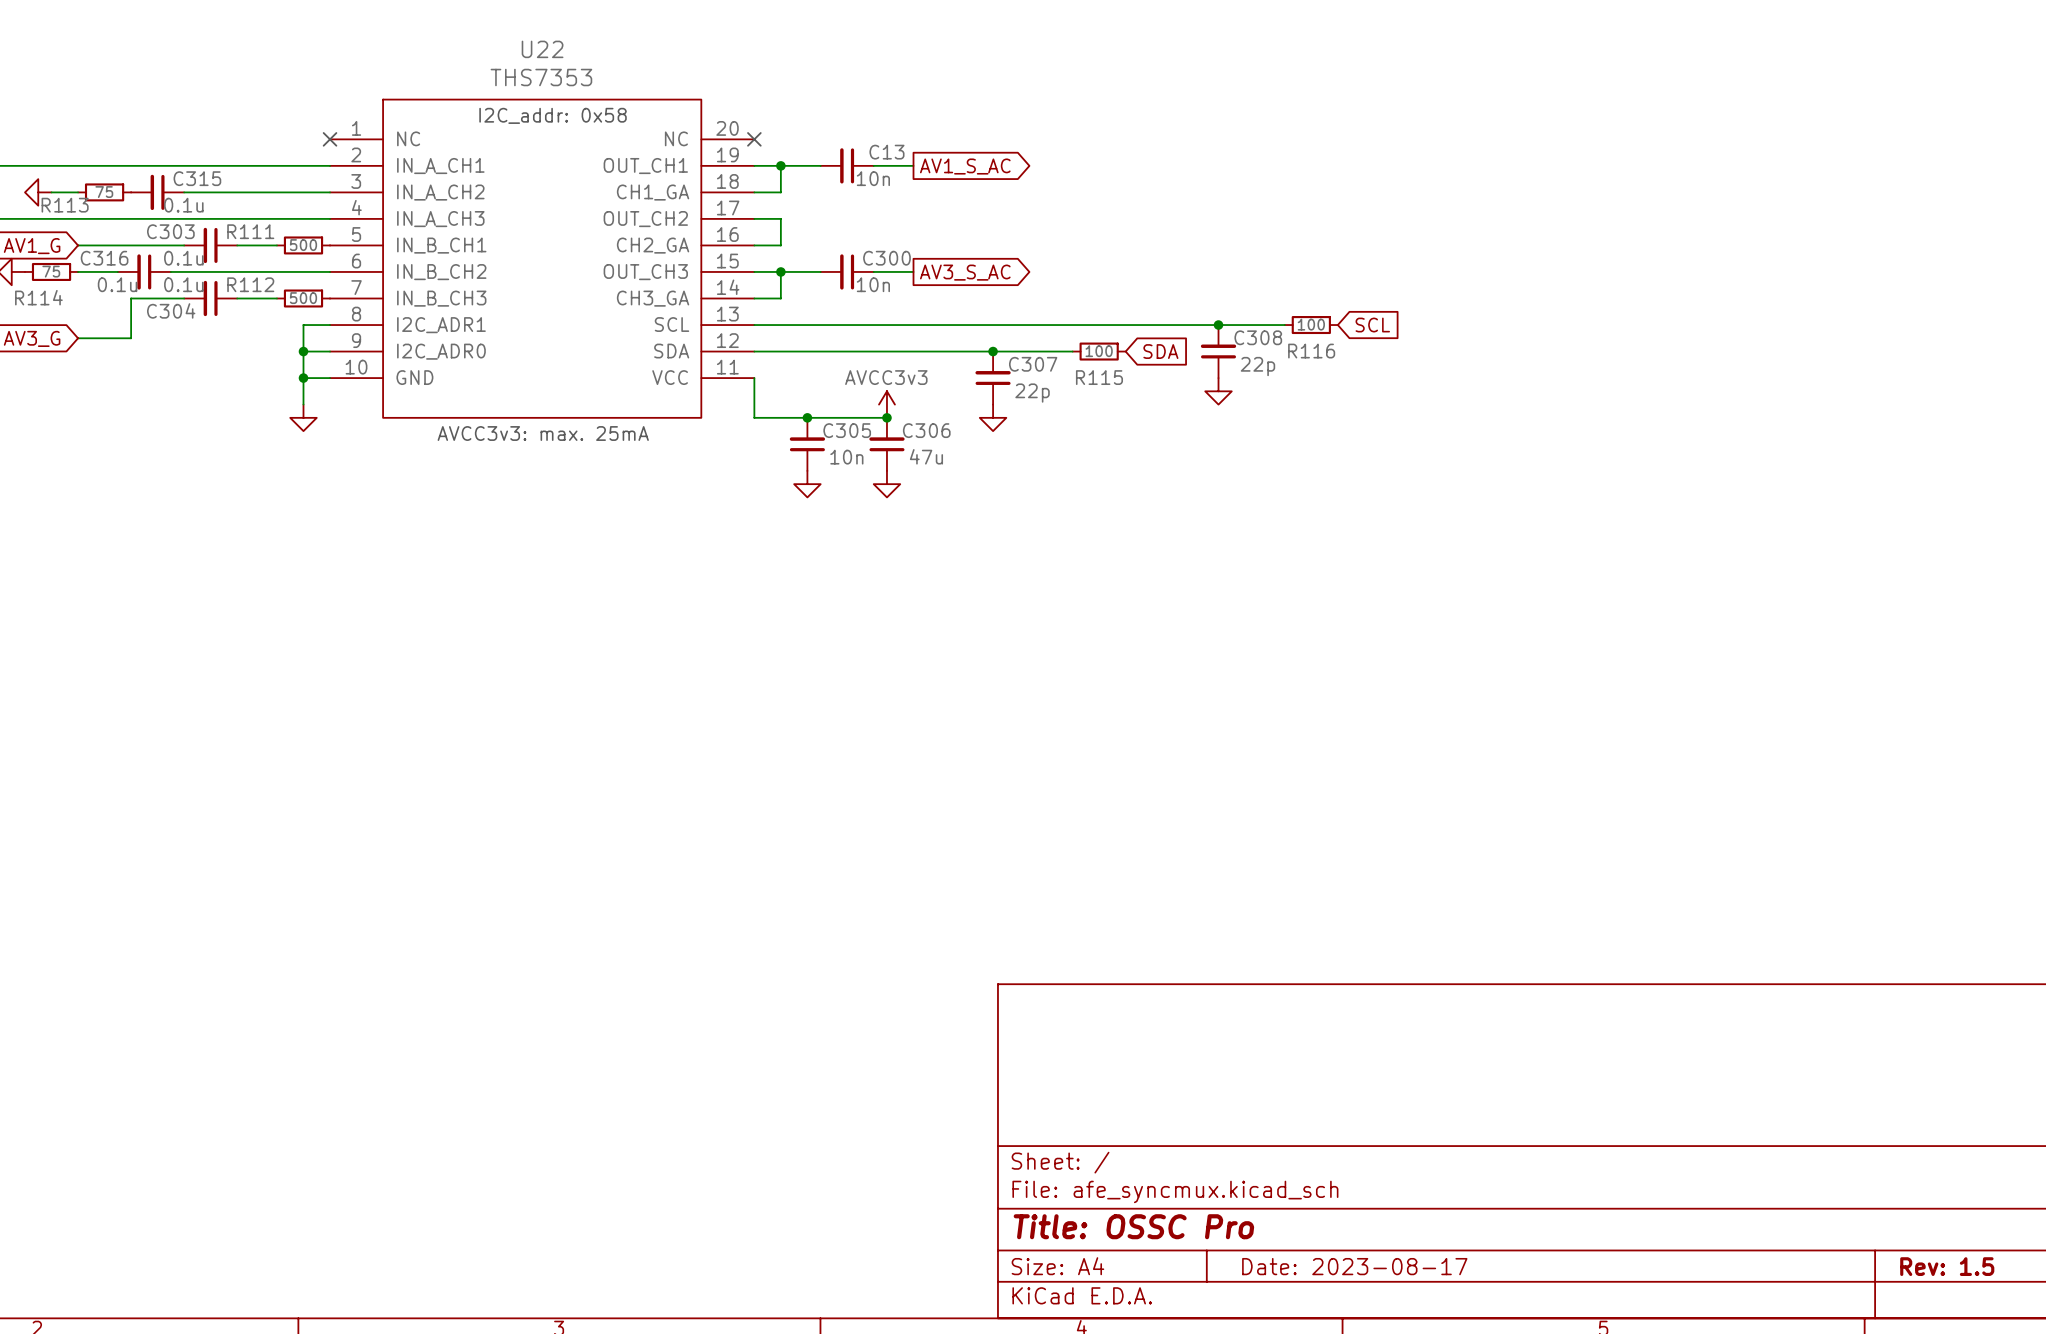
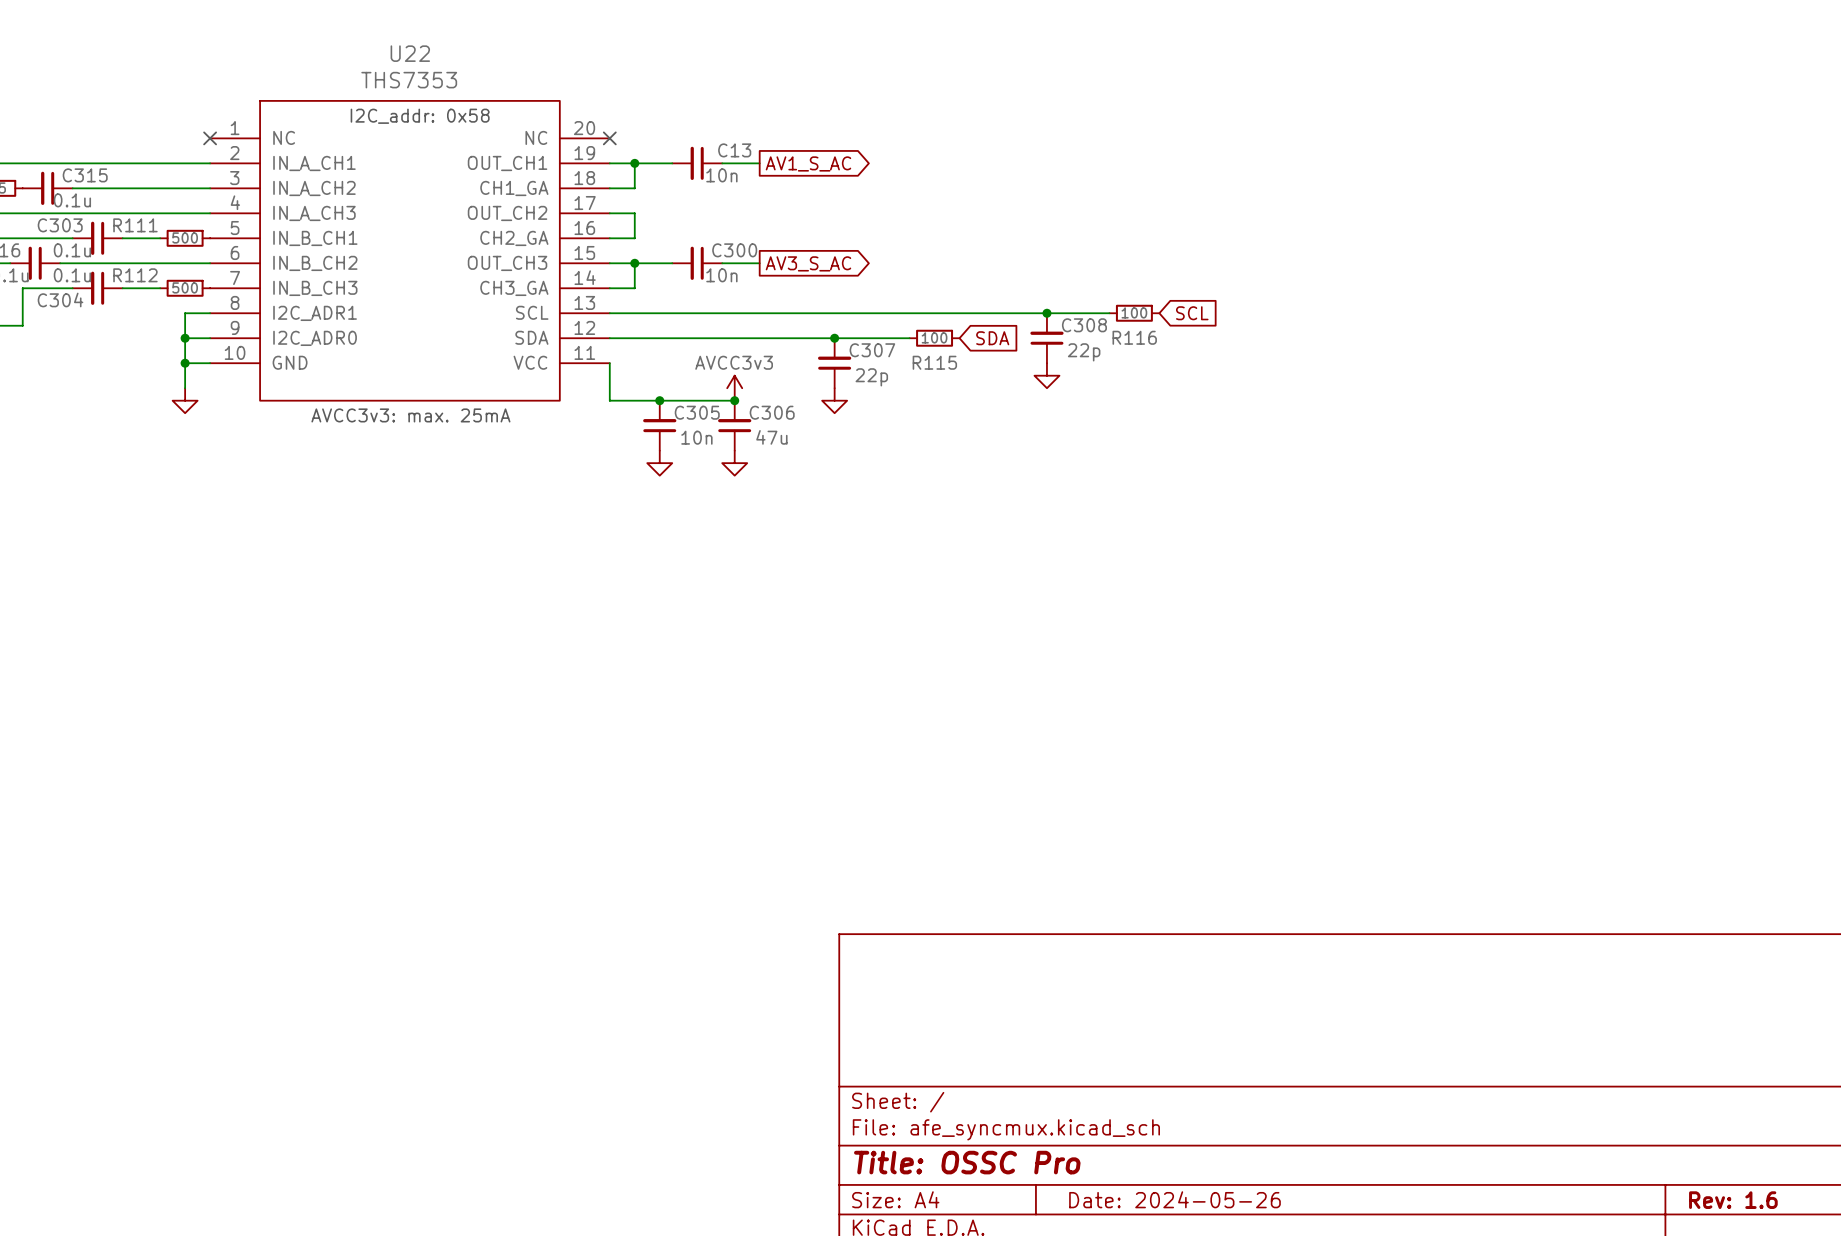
title block: Date: 2023-08-17 (1354, 1266) -> Date: 2024-05-26 (1174, 1199)
title block: Rev: 1.5 (1947, 1266) -> Rev: 1.6 (1733, 1200)

